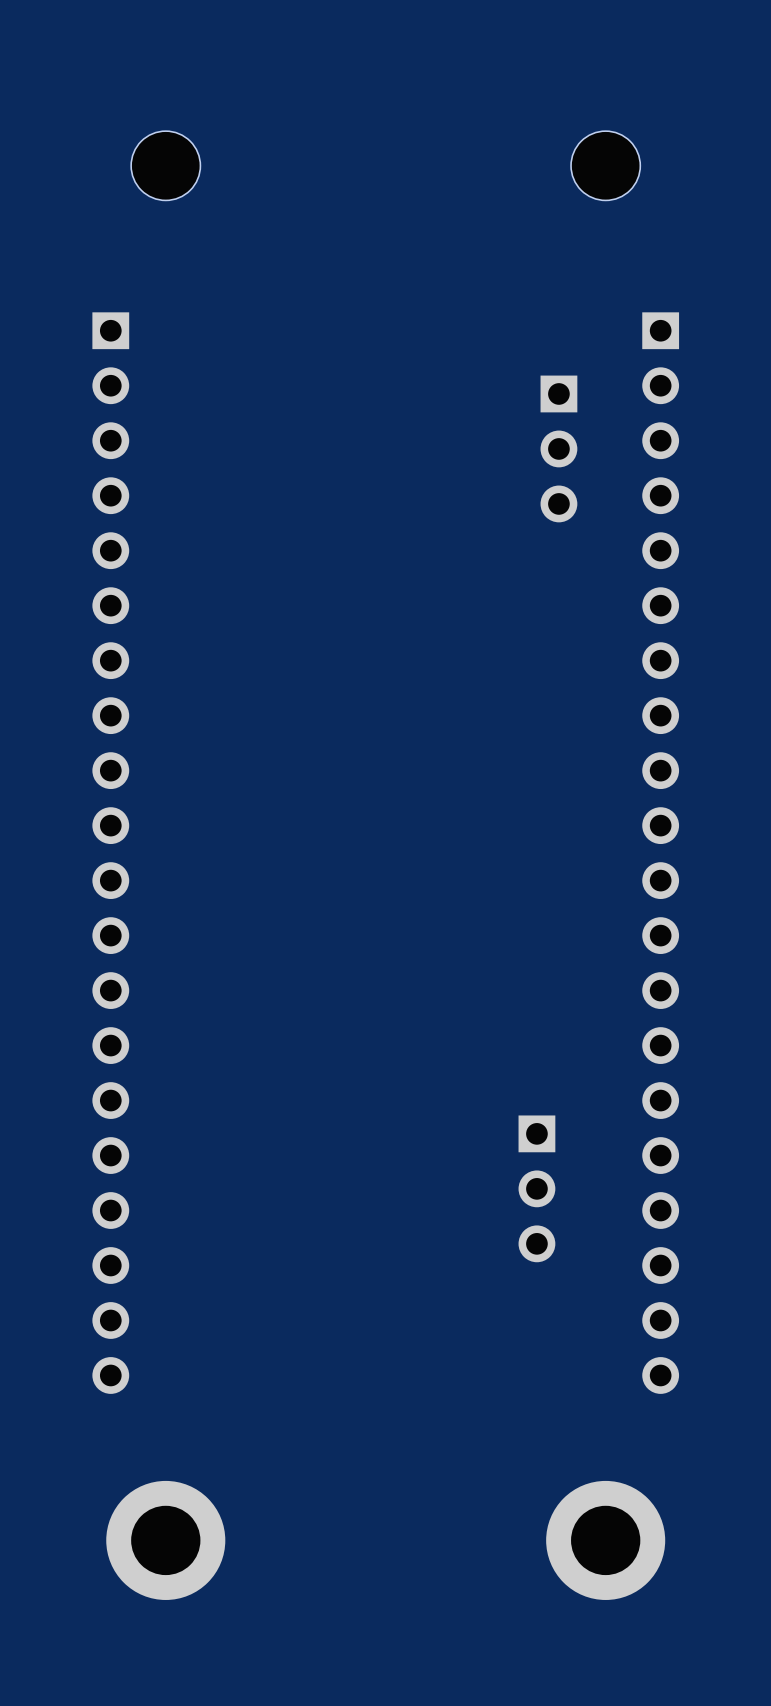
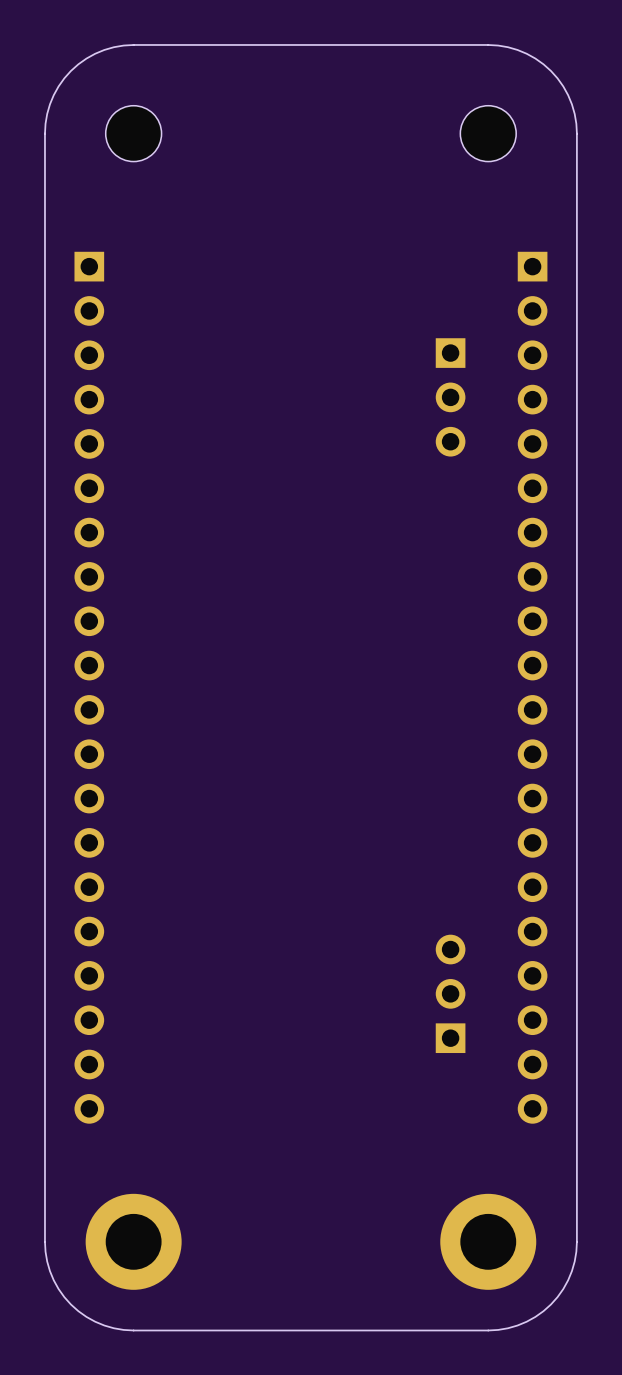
board edge: none -> (488, 44) (123, 45) (104, 49) (78, 64) (64, 78) (49, 104) (44, 133) (44, 1241) (47, 1261) (58, 1289) (78, 1311) (104, 1325) (133, 1330) (498, 1329) (517, 1325) (543, 1311) (557, 1297) (571, 1271) (576, 1241) (576, 123) (568, 95) (550, 70) (526, 53) (507, 47) (488, 44)
part position: (558, 448) -> (450, 397)
part rotation: 0° (536, 1188) -> 180° (450, 993)

